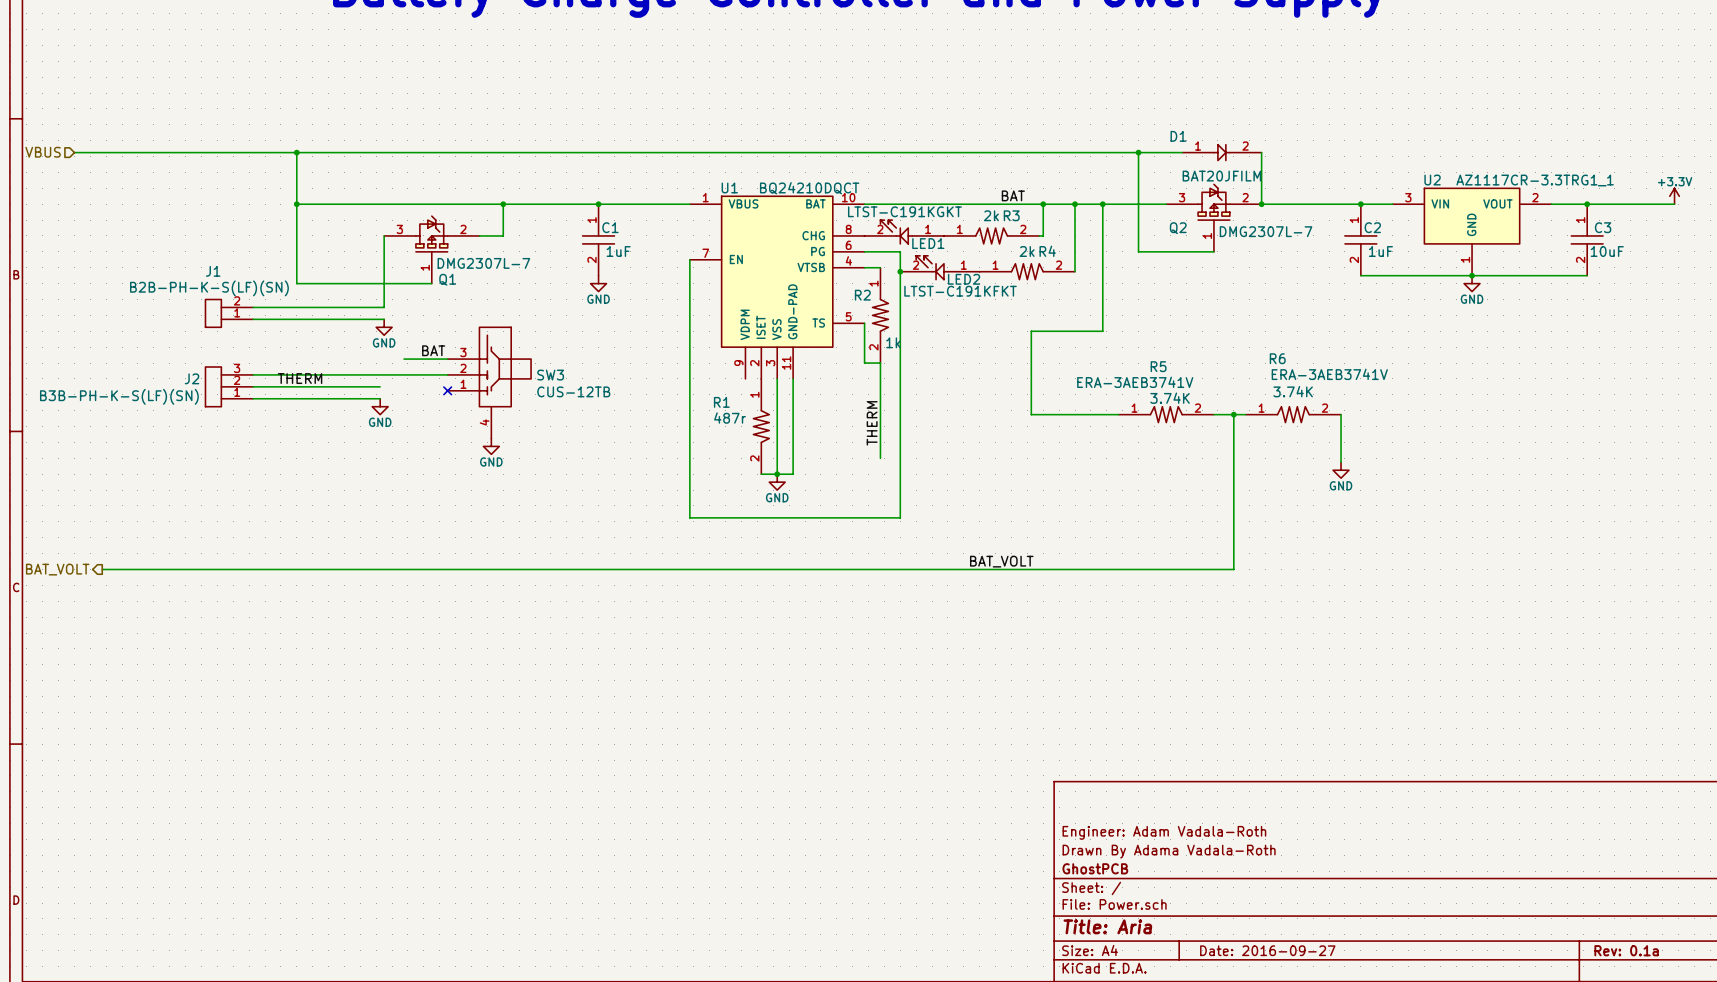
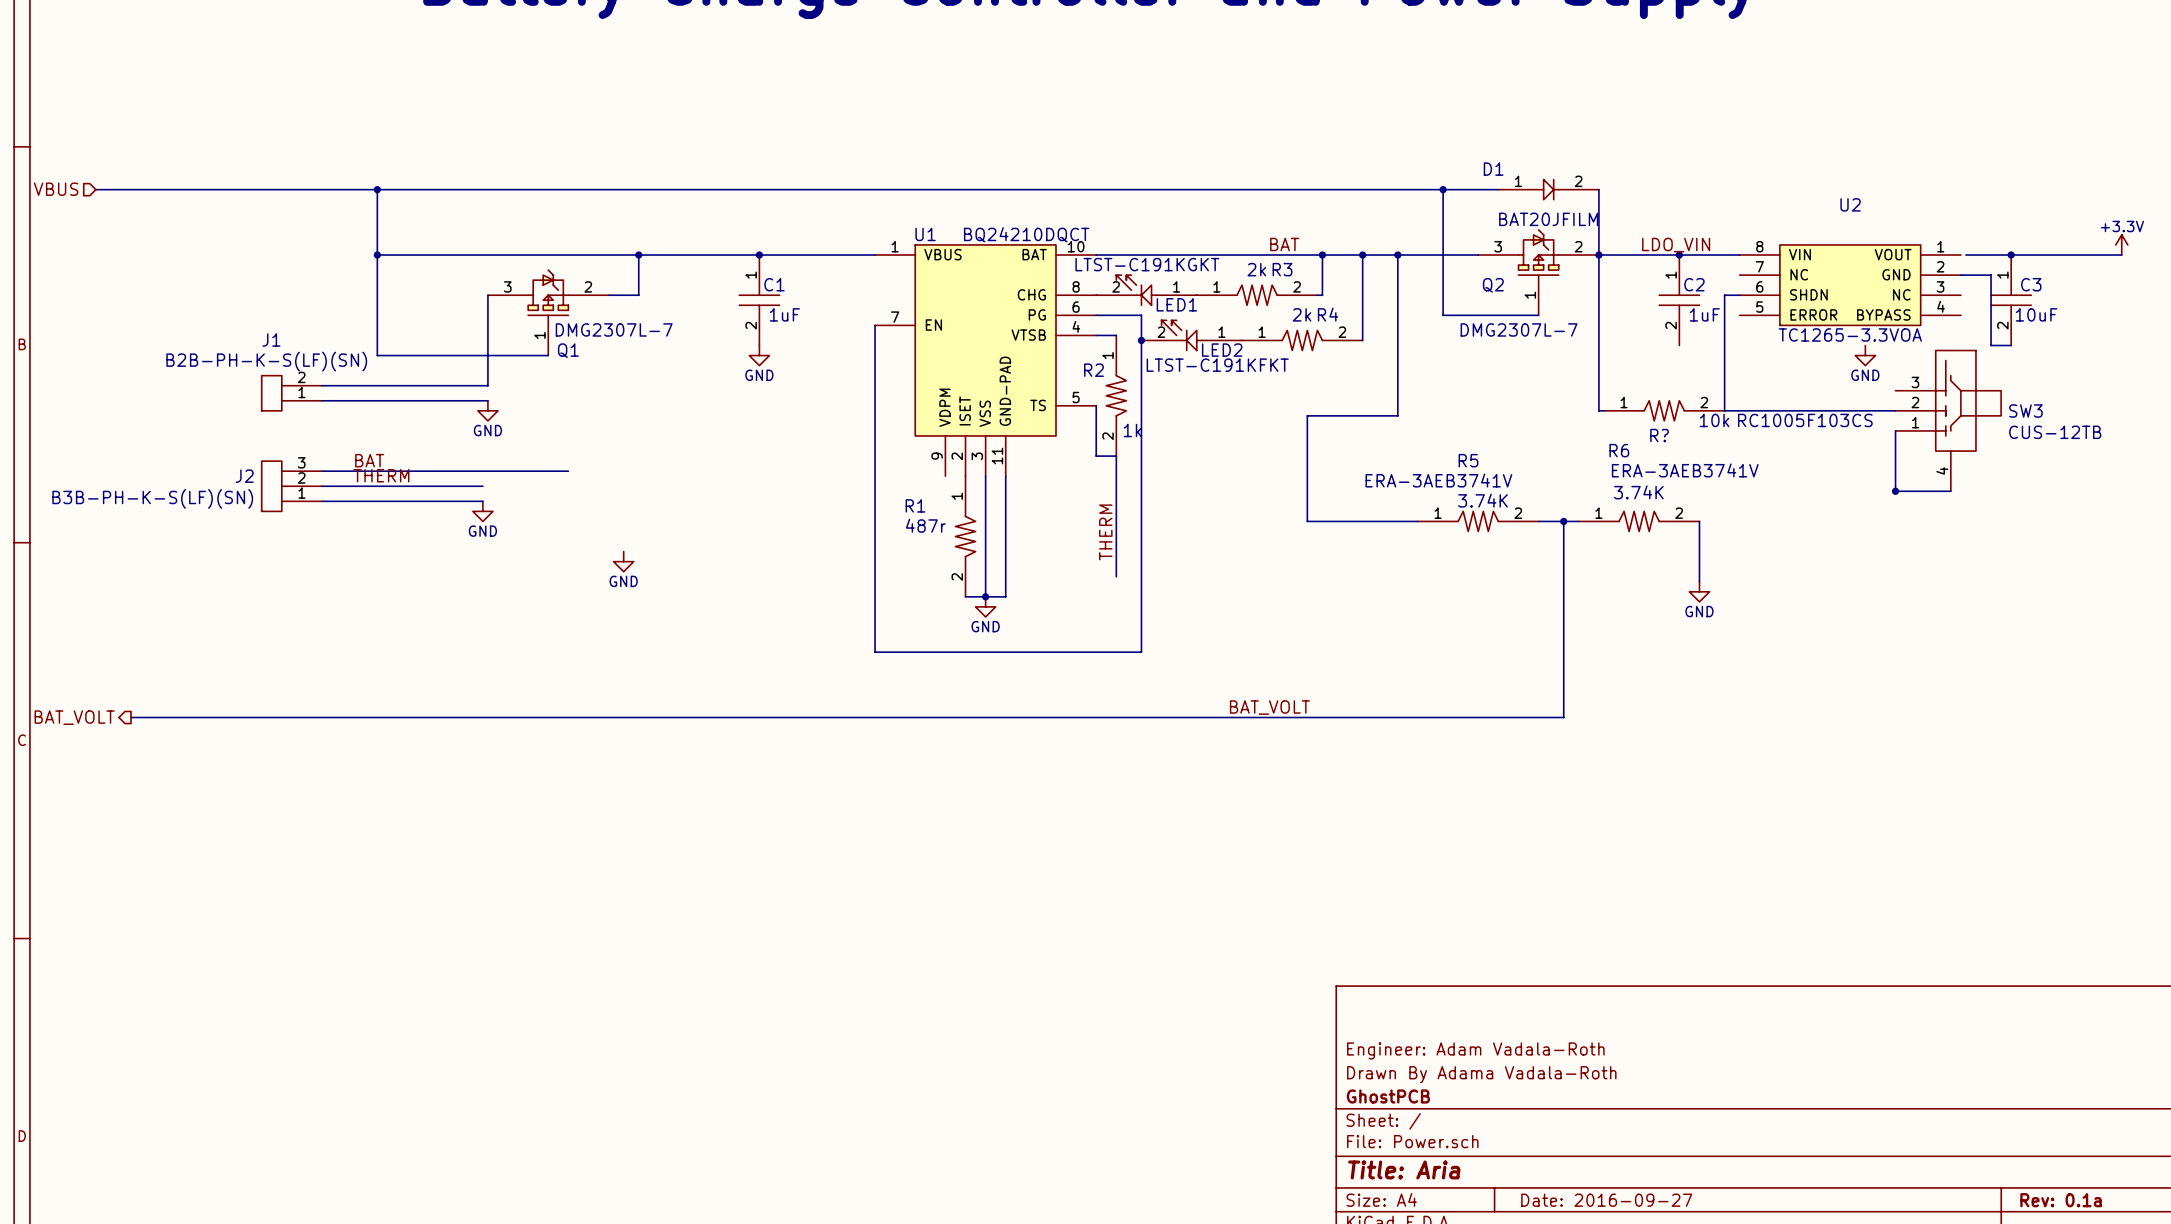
U2 name position: U2 (1432, 180) -> U2 (1850, 204)
U2 value: AZ1117CR-3.3TRG1_1 (1535, 180) -> TC1265-3.3VOA (1850, 334)
U2 symbol: [1392, 188, 1552, 276] -> [1739, 244, 1961, 326]
label: none -> LDO_VIN (1676, 245)
wire: none -> (1598, 255) (1598, 410) (1603, 410)
junction position: (1360, 204) -> (1679, 255)
Q2 value position: DMG2307L-7 (1266, 231) -> DMG2307L-7 (1519, 329)
wire: none -> (1739, 295) (1724, 295) (1724, 410) (1895, 410)
C2 position: (1360, 239) -> (1679, 300)
wire: (1360, 275) (1571, 275) -> (1960, 275) (1991, 275) (1991, 345)
junction: (1472, 275) -> none
R?: none -> RC1005F103CS (1664, 410)
wire: none -> (1895, 430) (1895, 491) (1950, 491)
label position: BAT (433, 350) -> BAT (369, 460)
wire: (404, 359) (447, 359) -> none
SW3 position: (489, 382) -> (1948, 420)
no-connect mark: (447, 390) -> none
junction: none -> (1895, 491)

